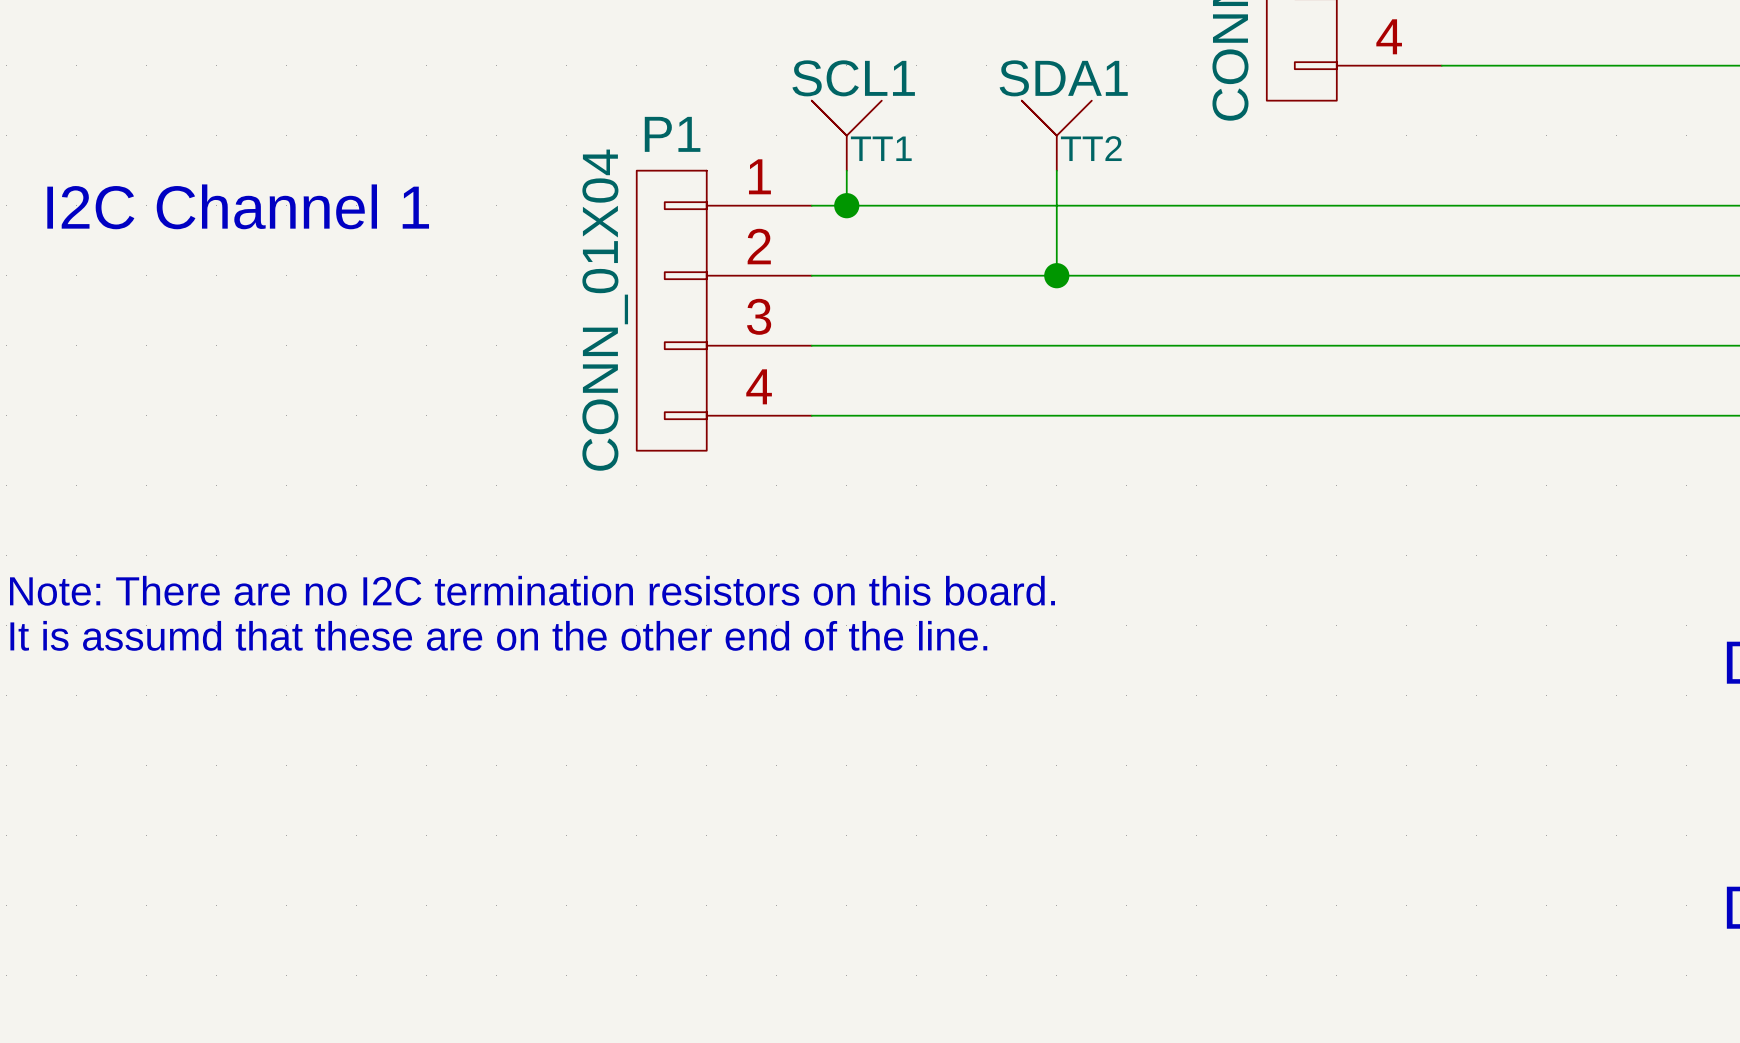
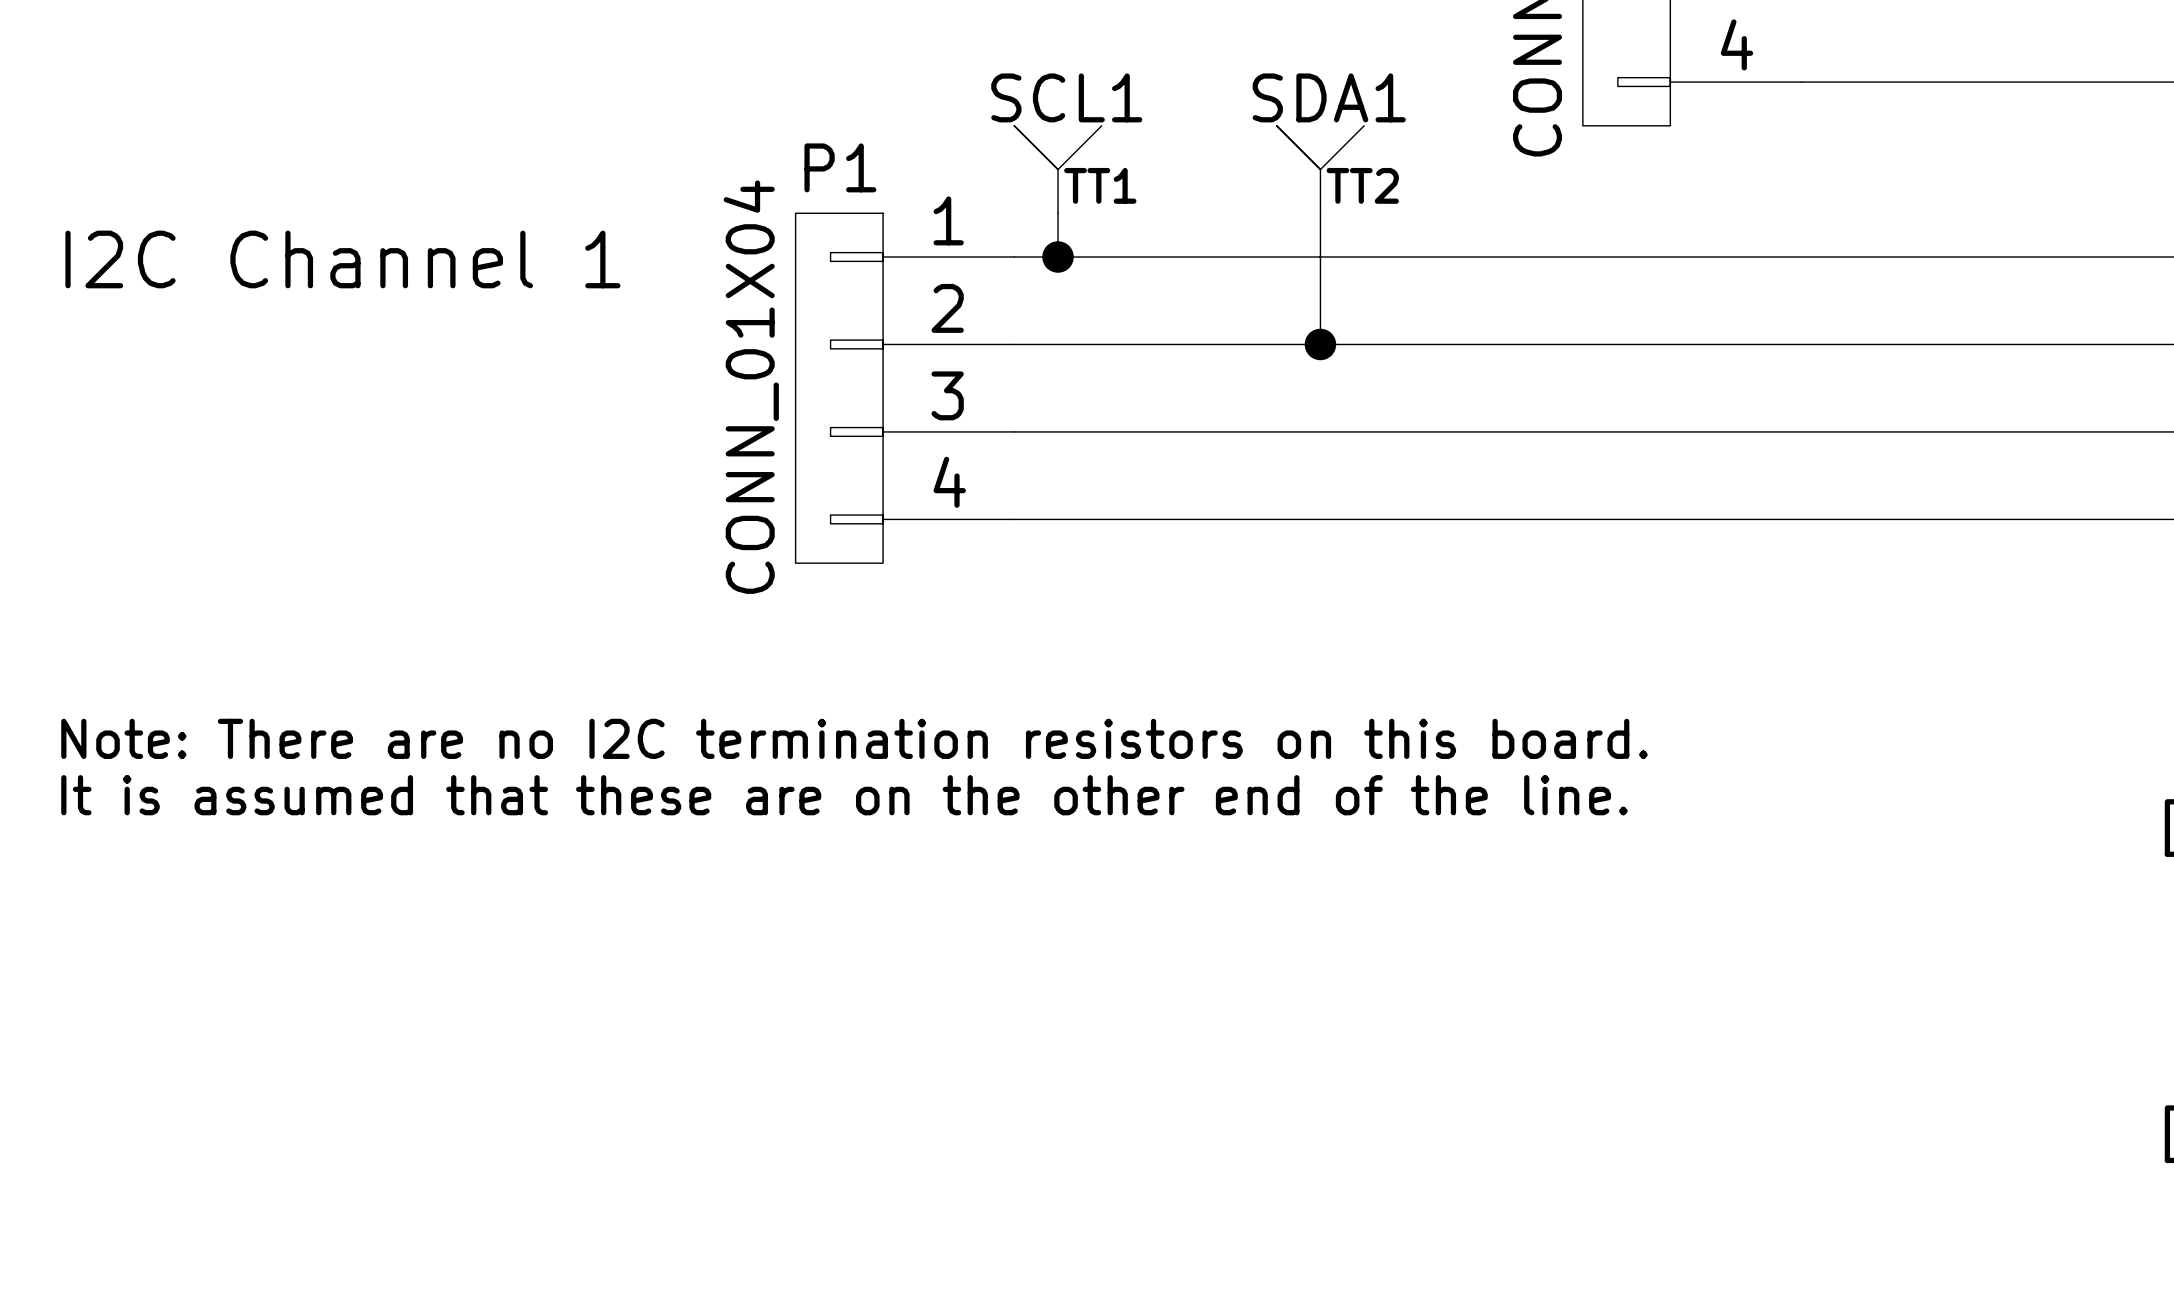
text position: Note: There are no I2C termination resistors on this board. (532, 590) -> Note: There are no I2C termination resistors on this board. (854, 738)
text: It is assumd that these are on the other end of the line. (498, 635) -> It is assumed that these are on the other end of the line. (844, 795)

